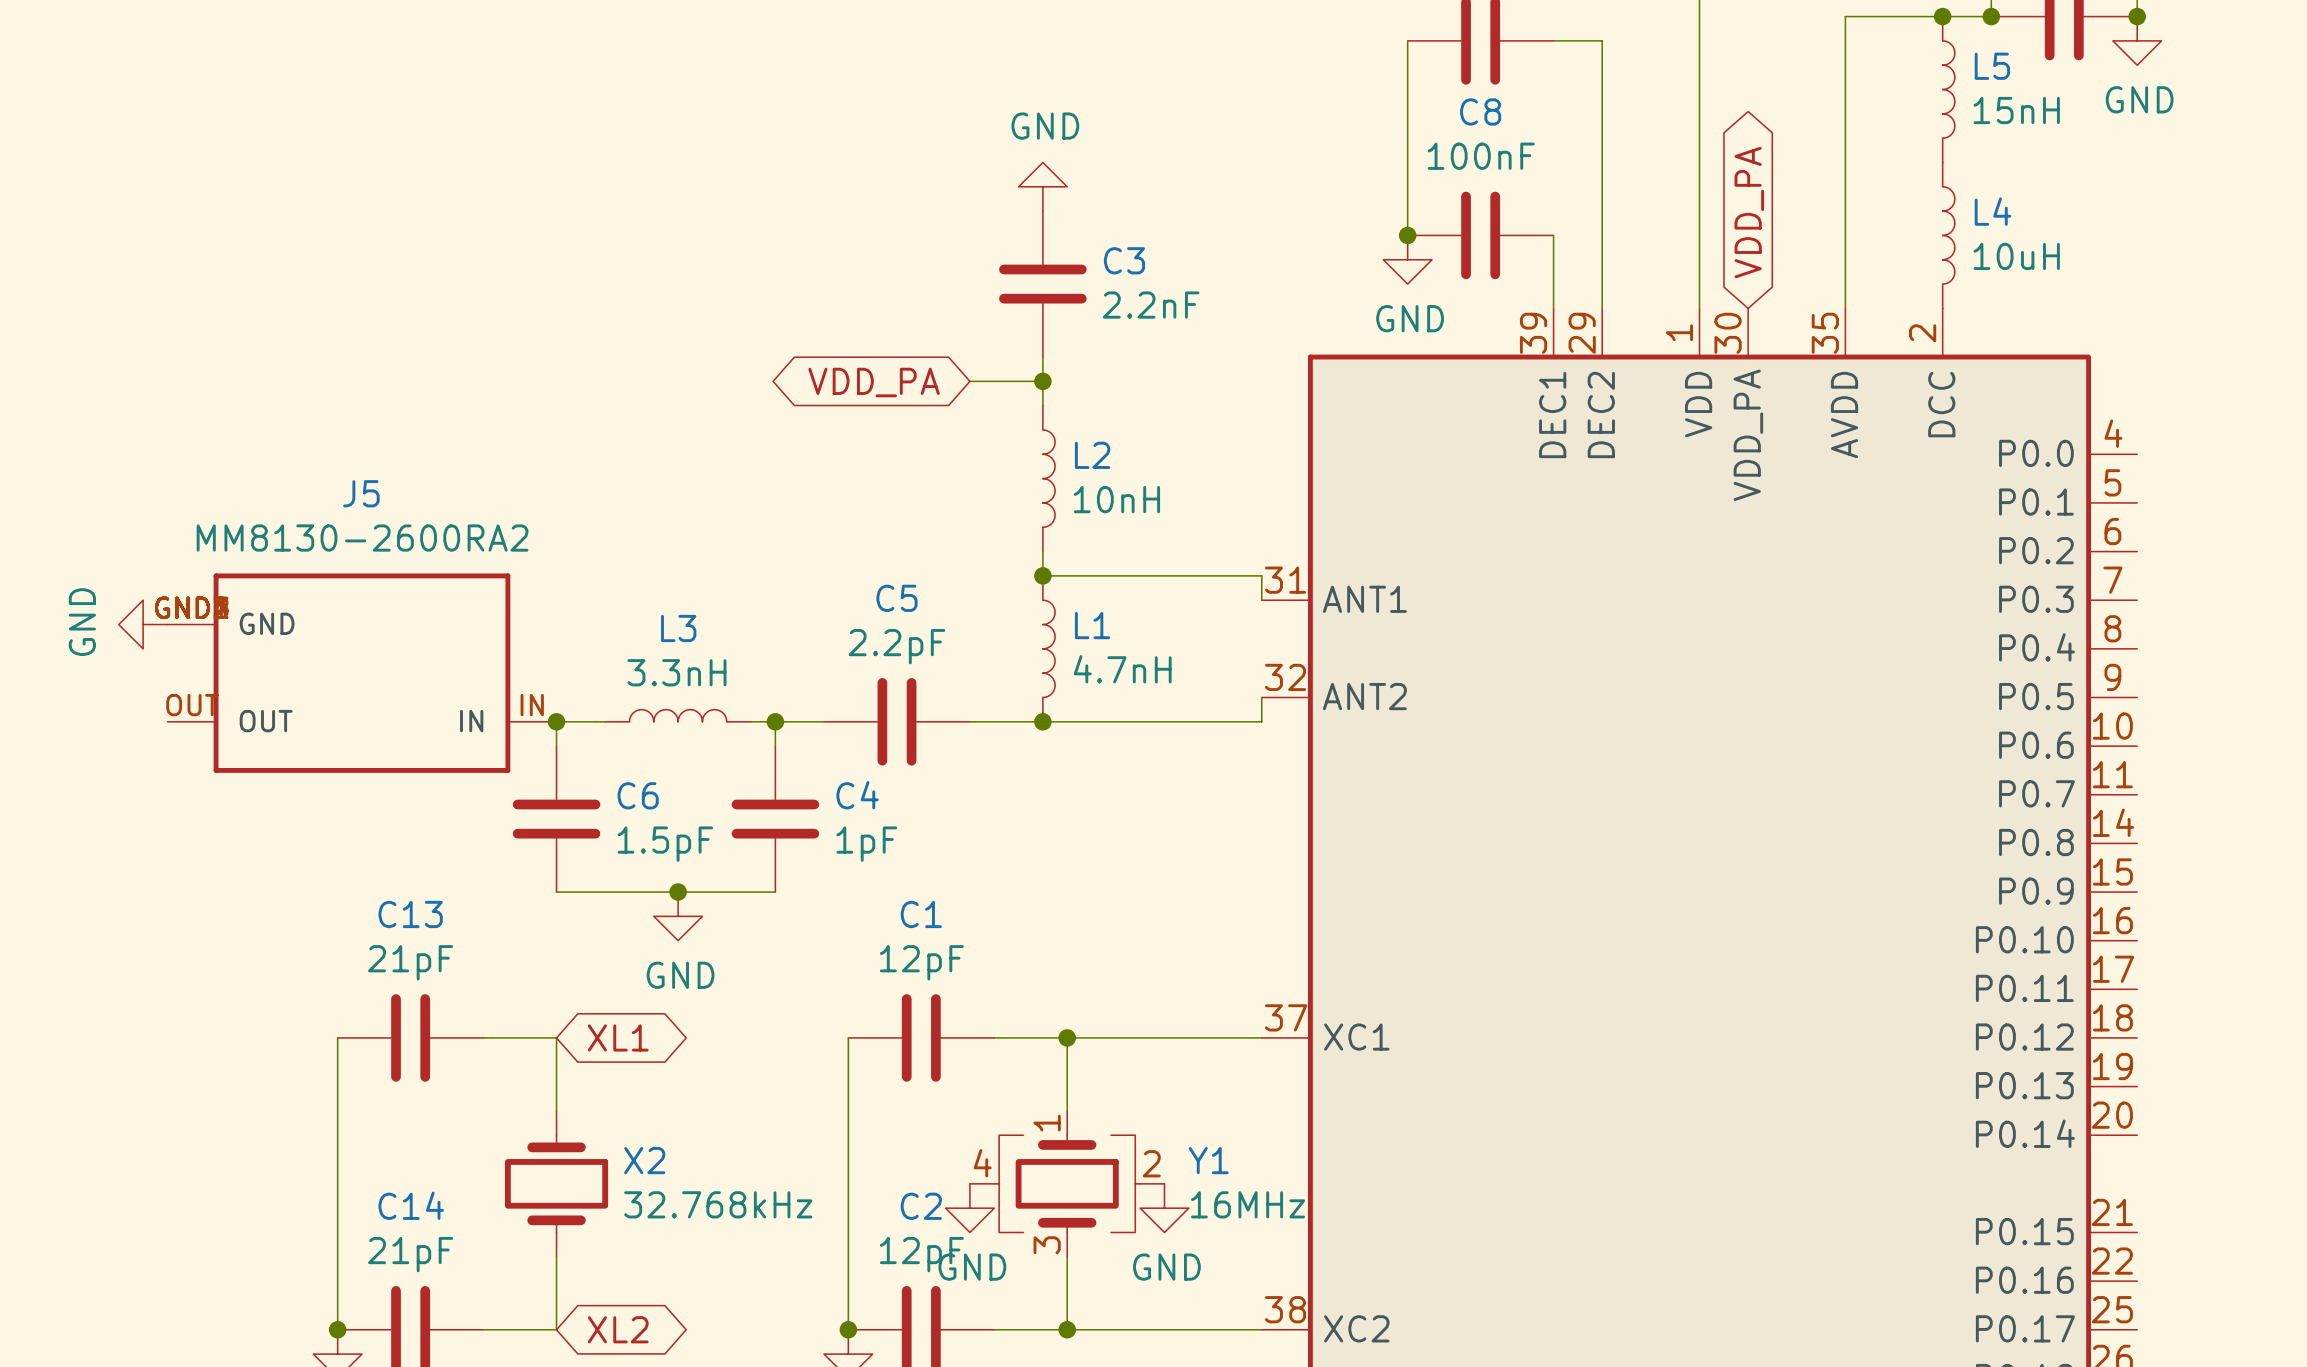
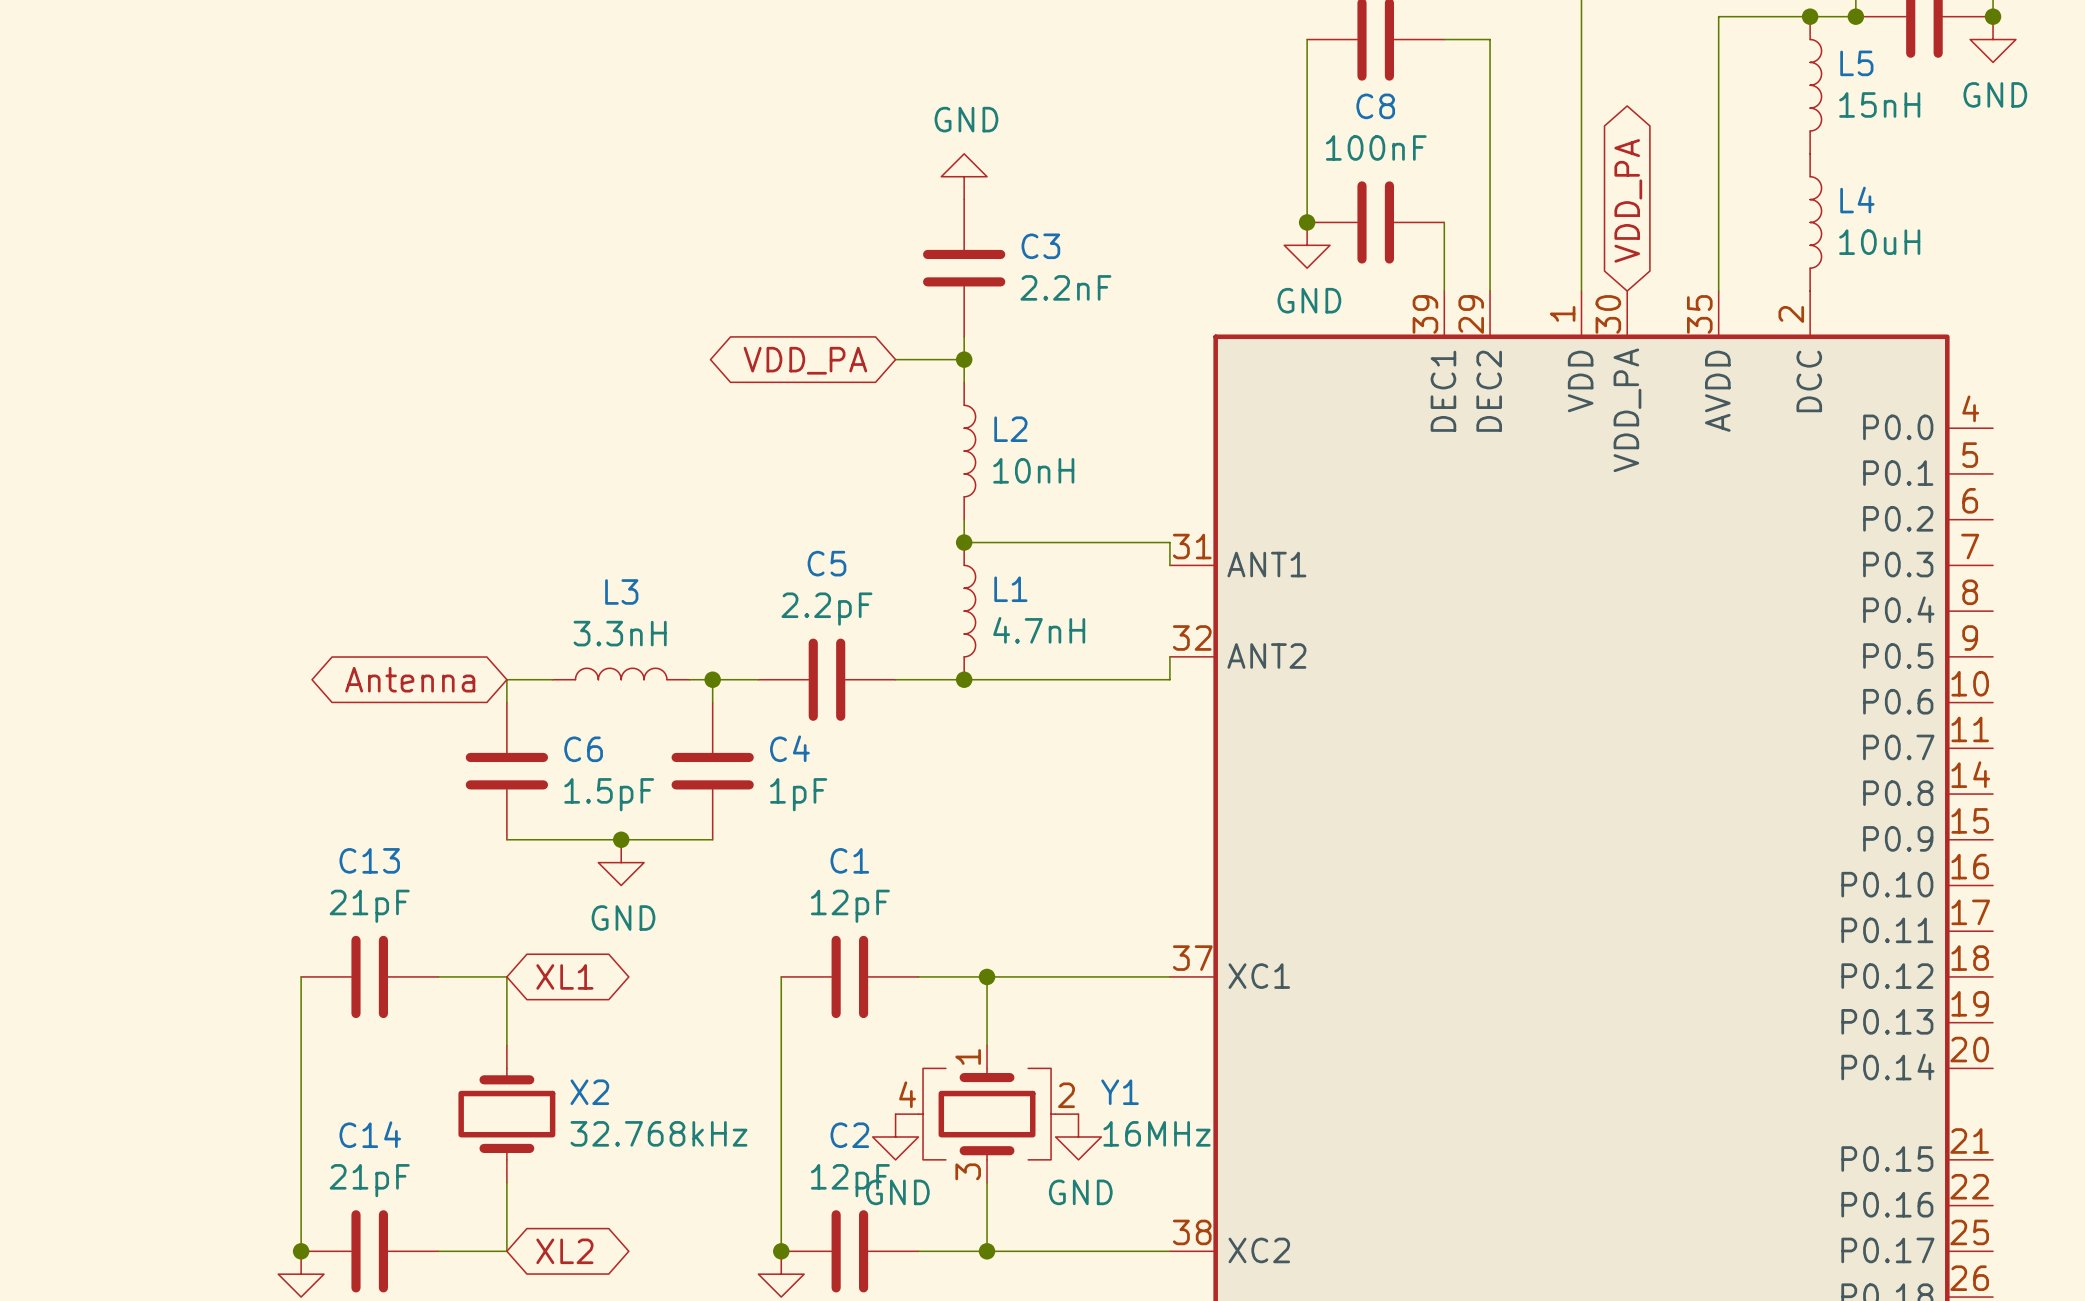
power symbol: GND (143, 624) -> none
J5: MM8130-2600RA2 (361, 673) -> none
global label: none -> Antenna (410, 679)
junction: (556, 721) -> none

